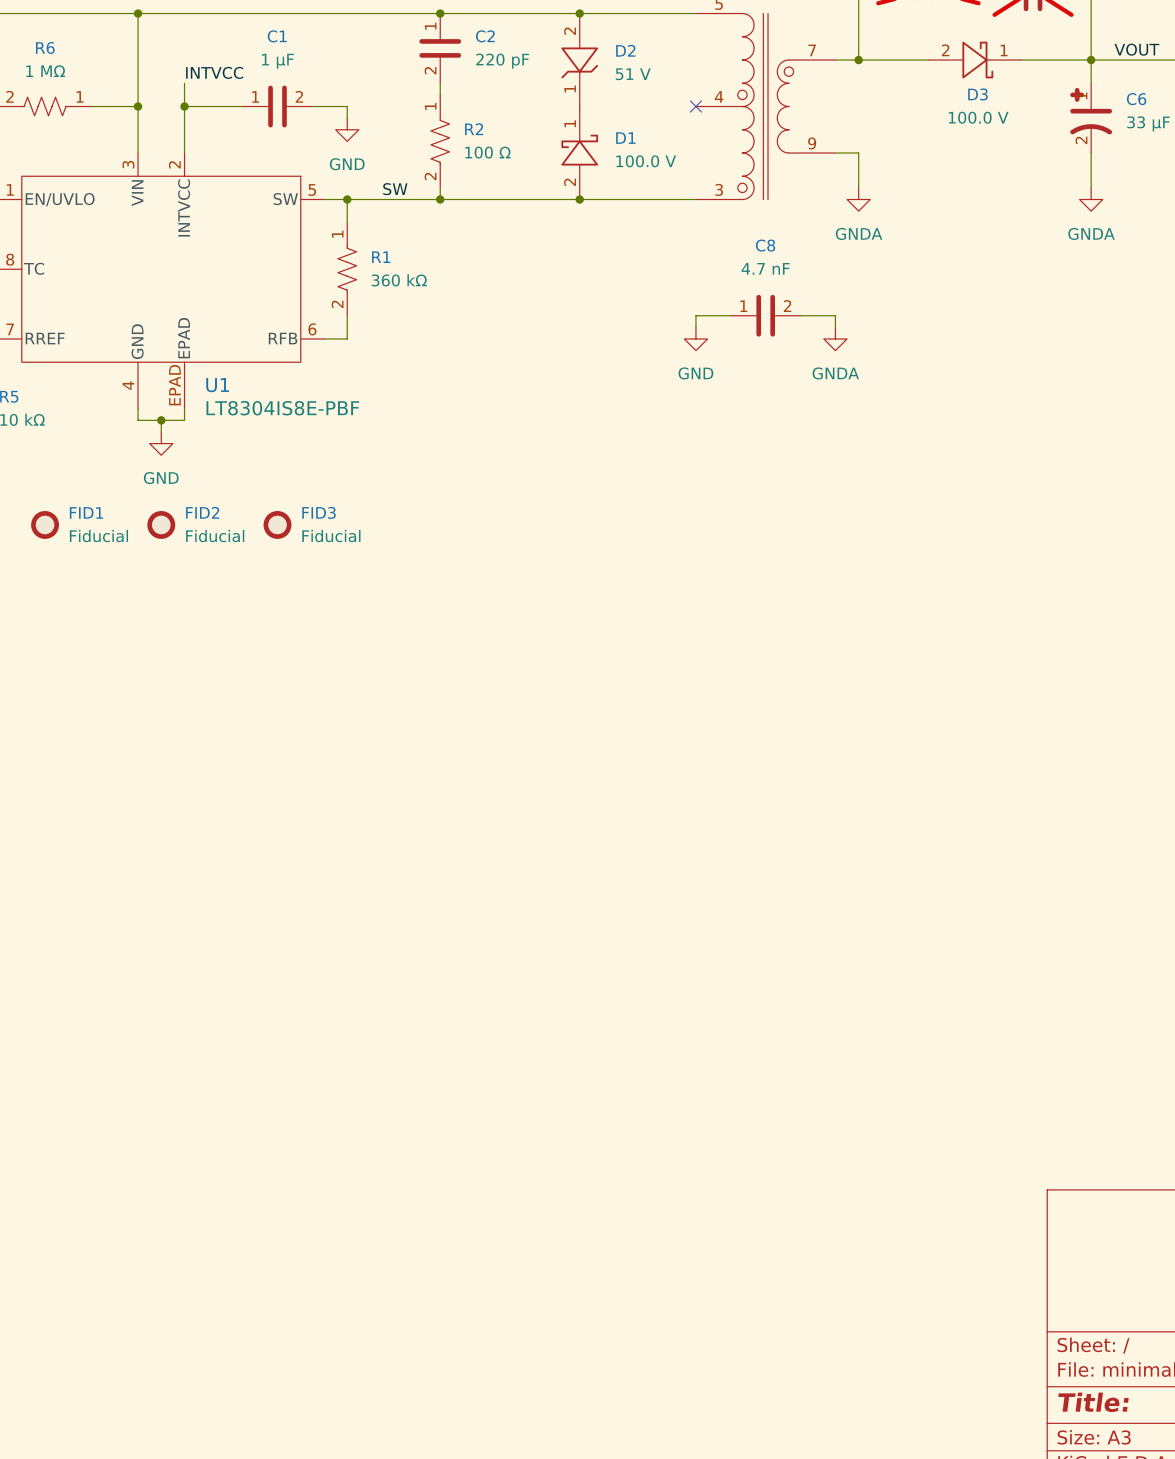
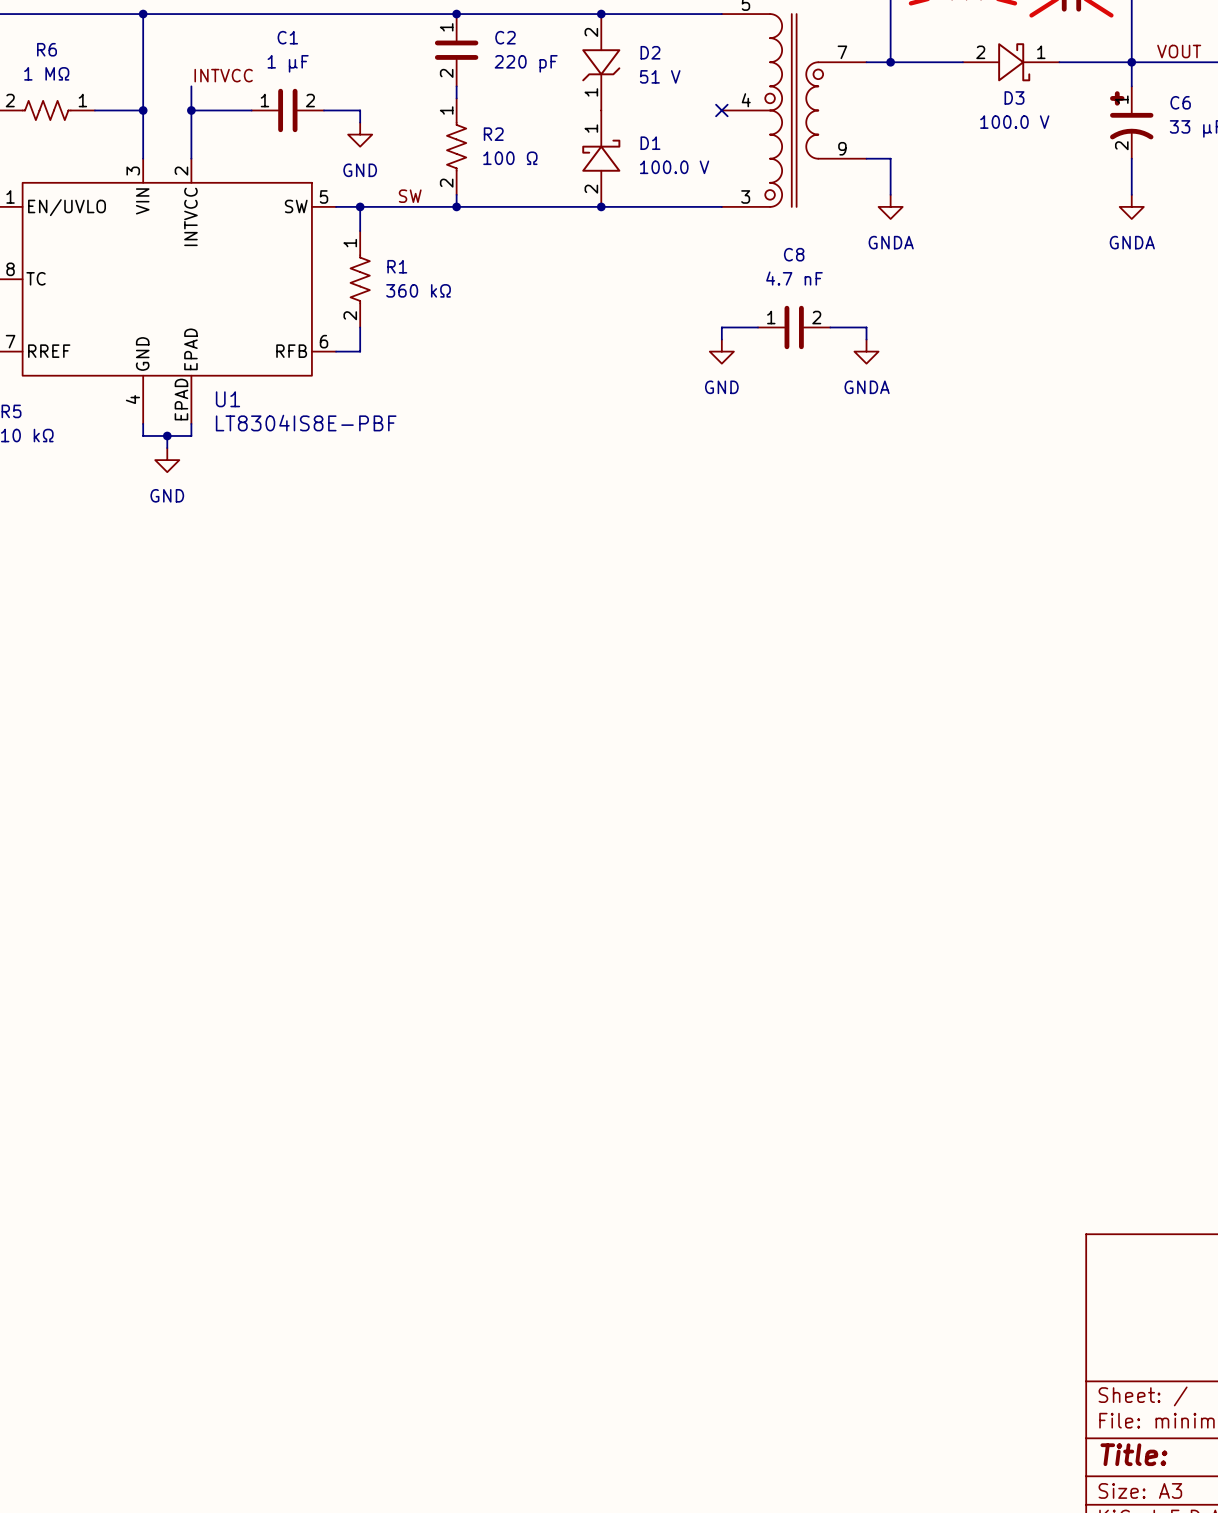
FID1: Fiducial (45, 524) -> none
FID2: Fiducial (161, 524) -> none
FID3: Fiducial (277, 524) -> none

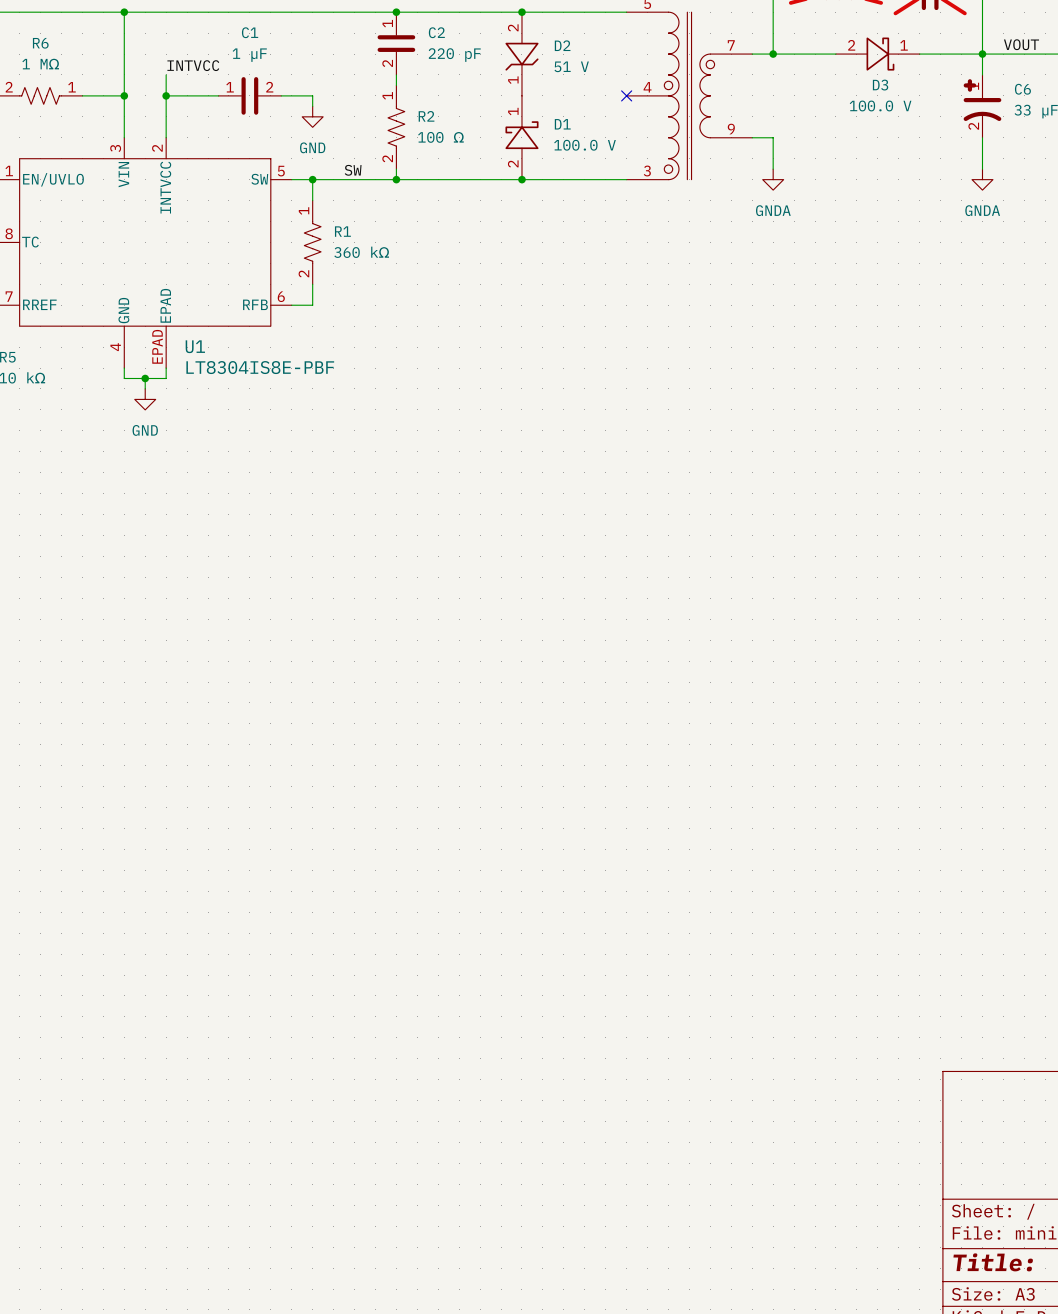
wire: (758, 327) (721, 327) (721, 339) -> none
C8: 4.7 nF (794, 327) -> none
wire: (830, 327) (866, 327) (866, 339) -> none
power symbol: GND (721, 351) -> none
power symbol: GNDA (866, 351) -> none

